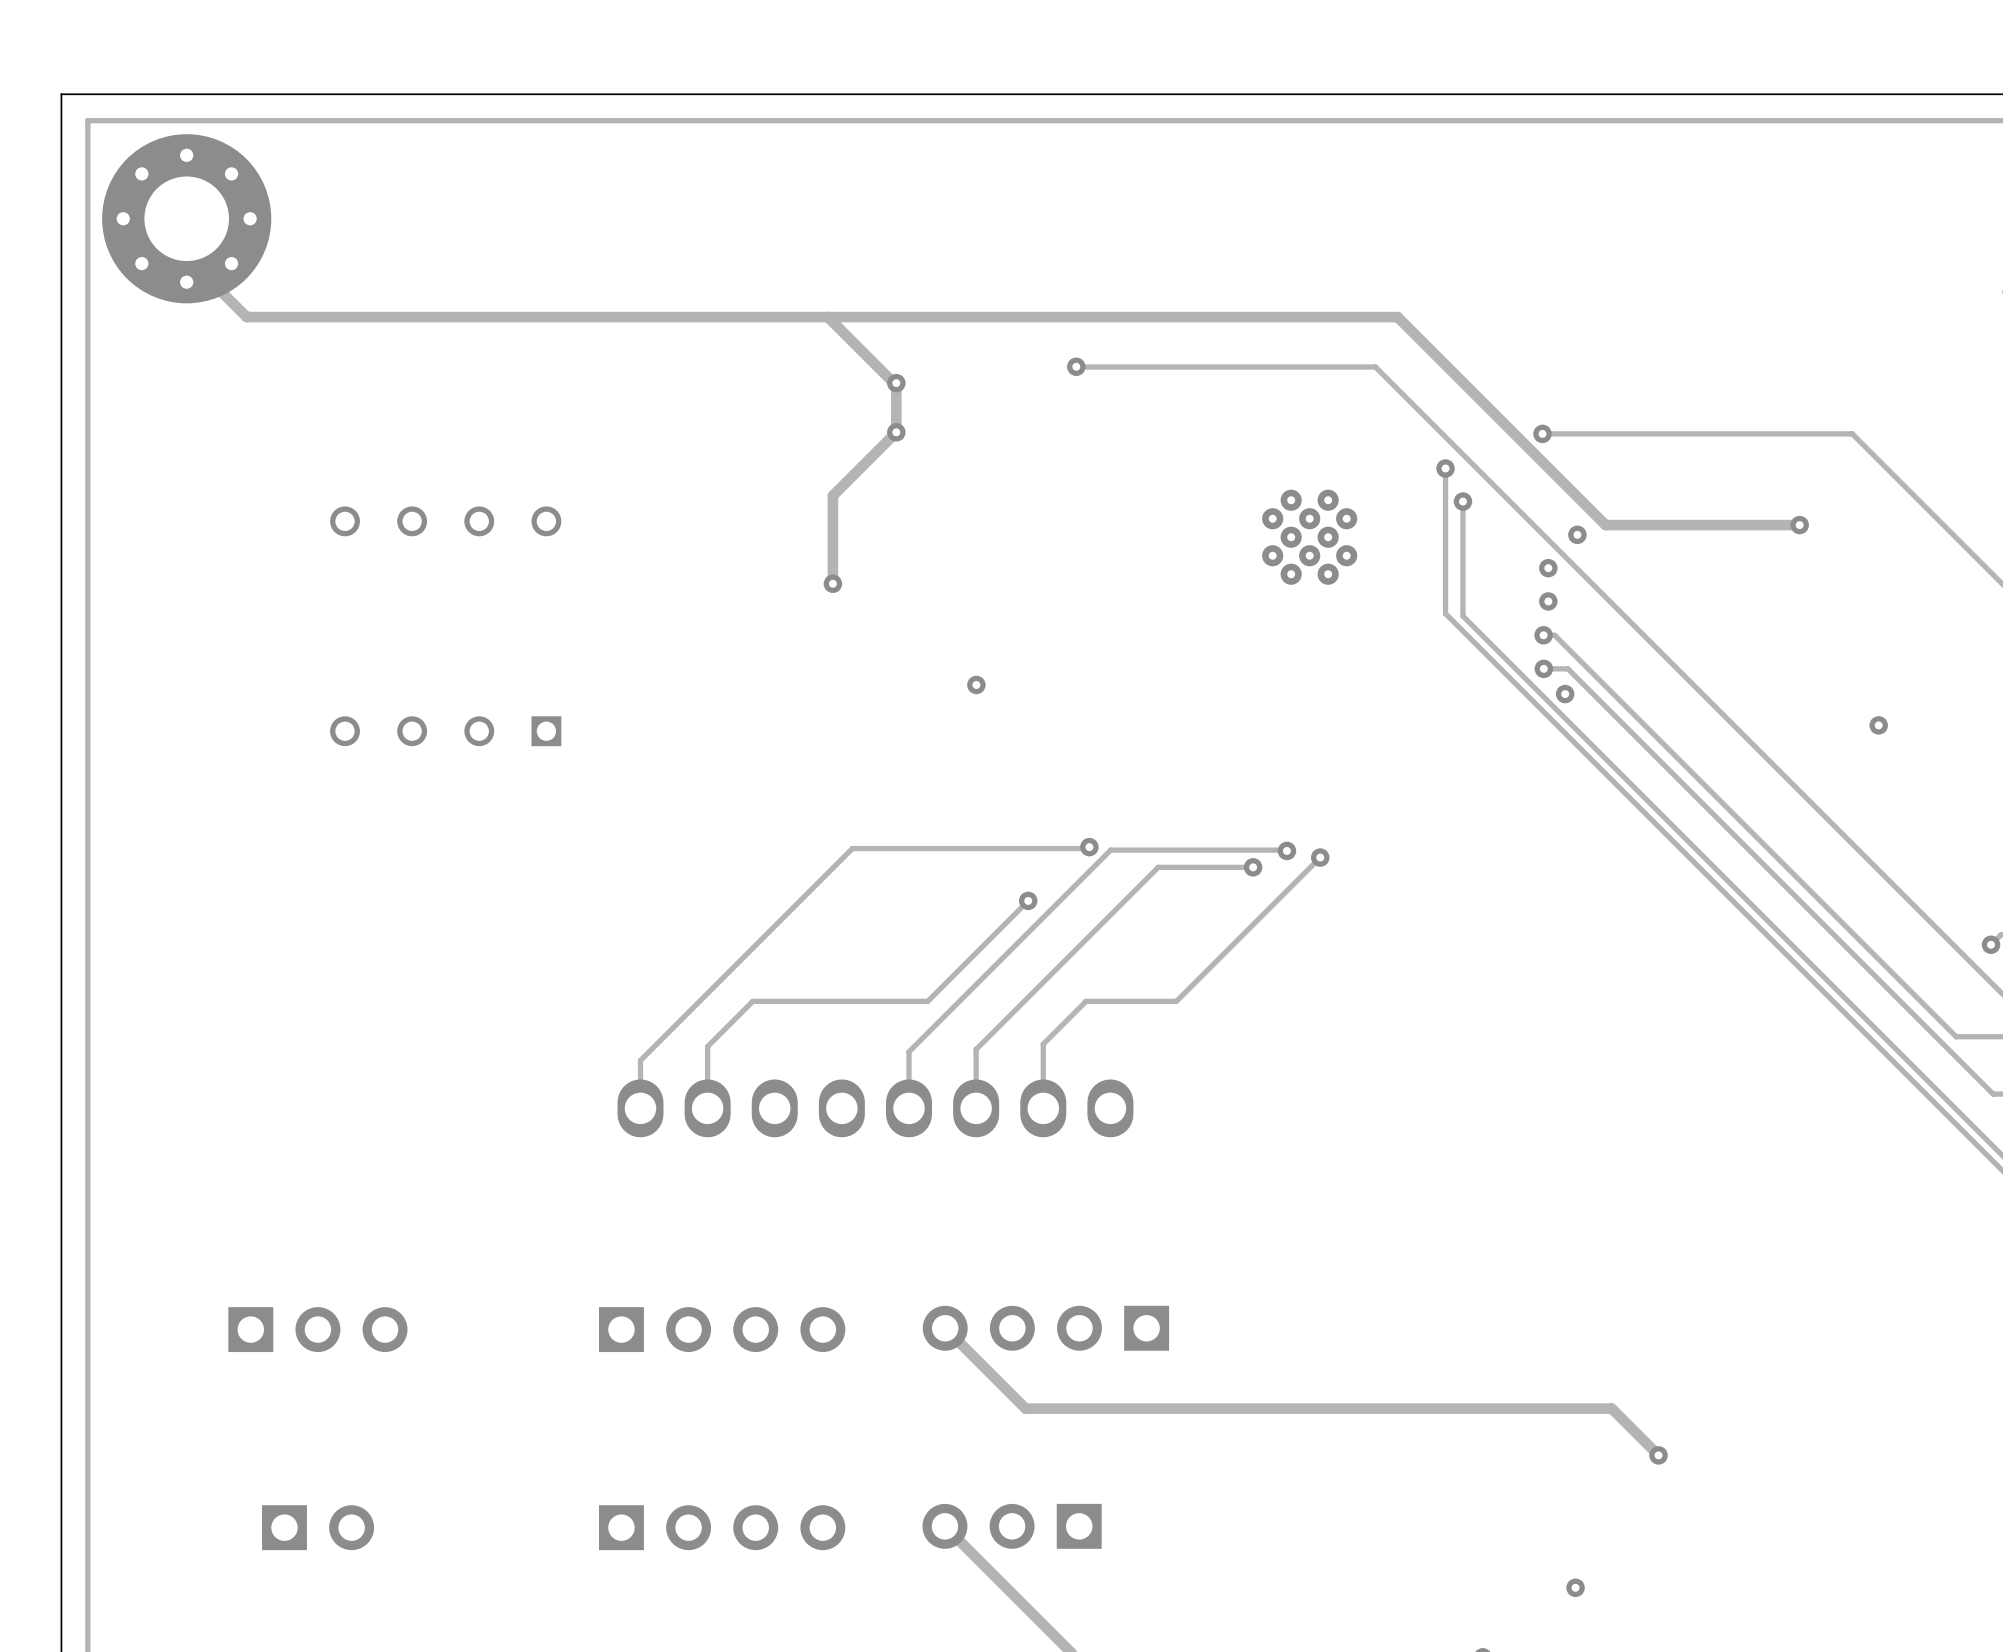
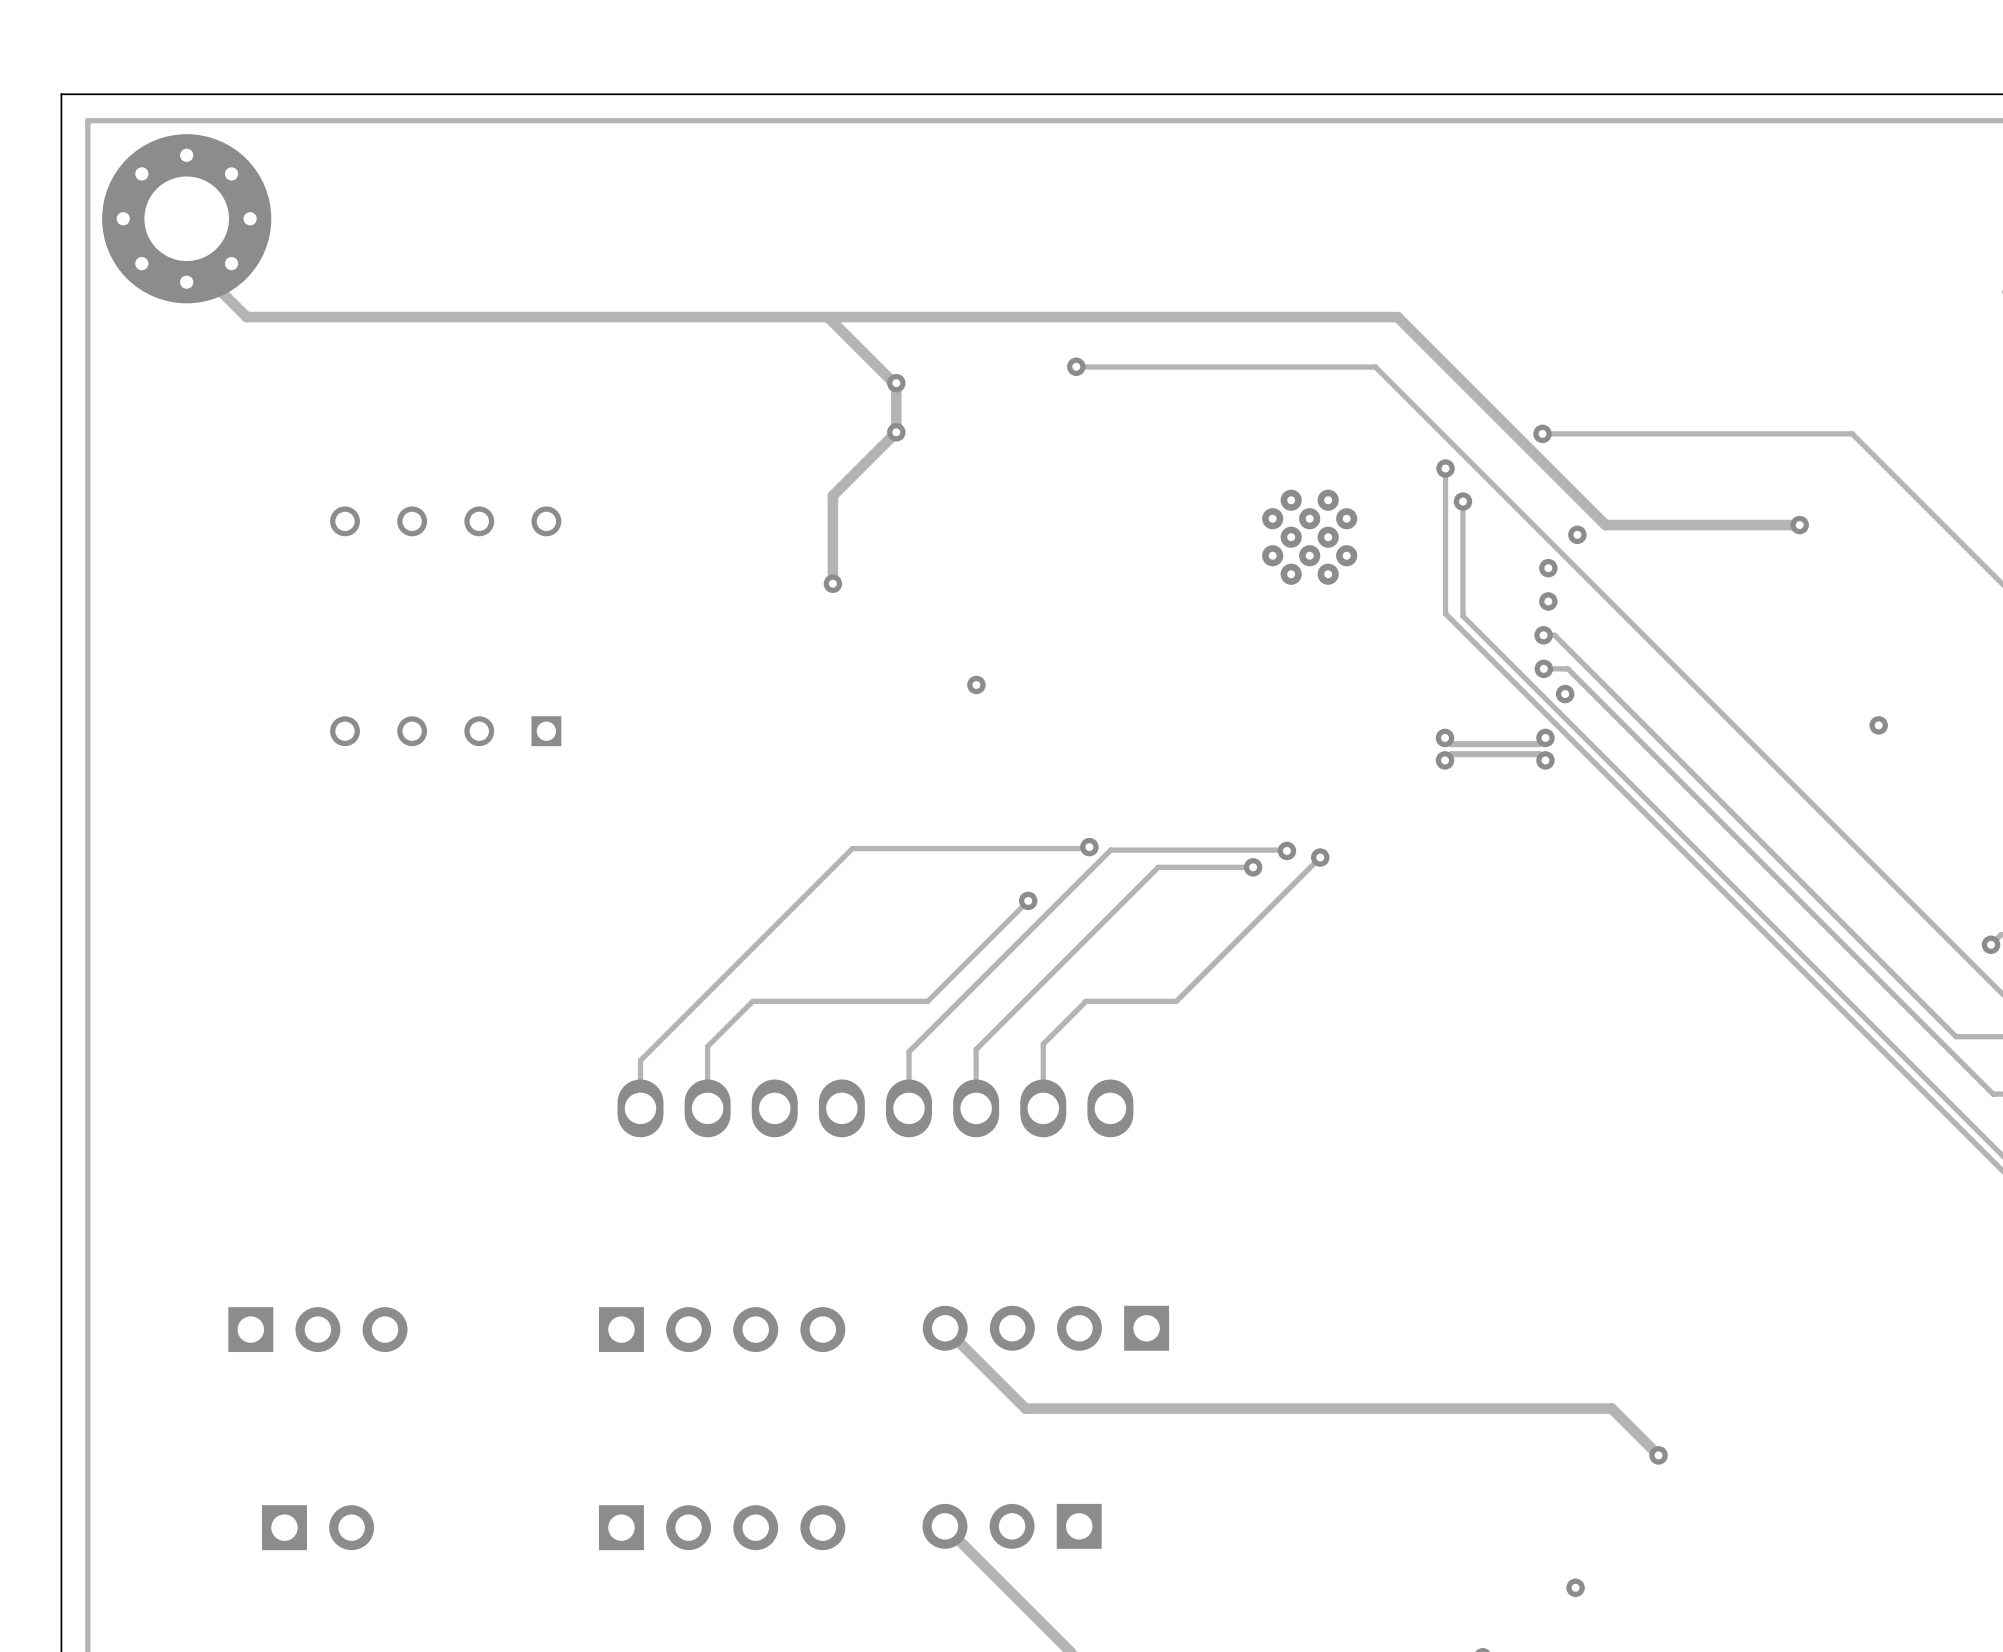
via: none -> (1445, 737)
track: none -> (1545, 737) (1539, 744) (1451, 744) (1445, 737)
via: none -> (1545, 737)
via: none -> (1445, 760)
track: none -> (1545, 760) (1539, 754) (1451, 754) (1445, 760)
via: none -> (1545, 760)

